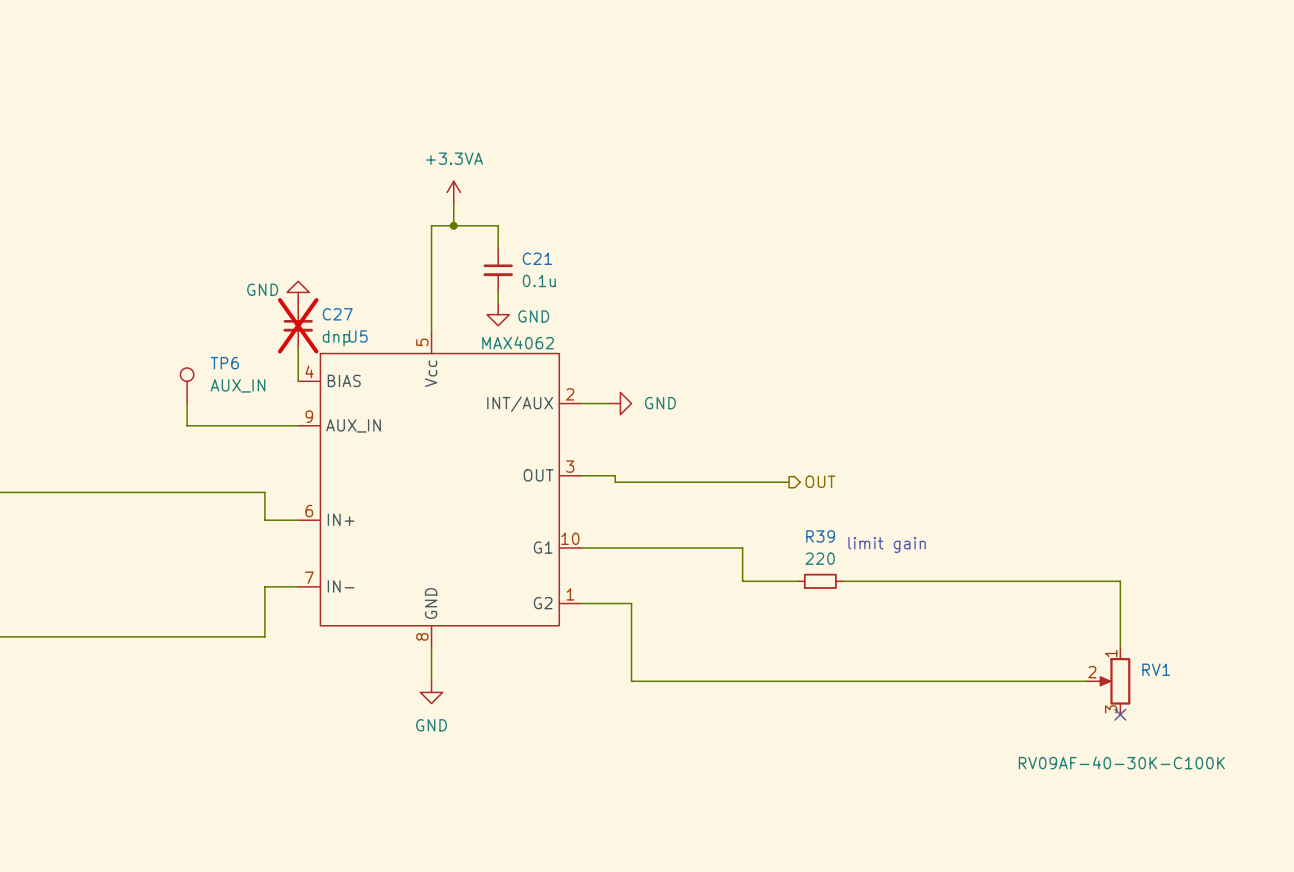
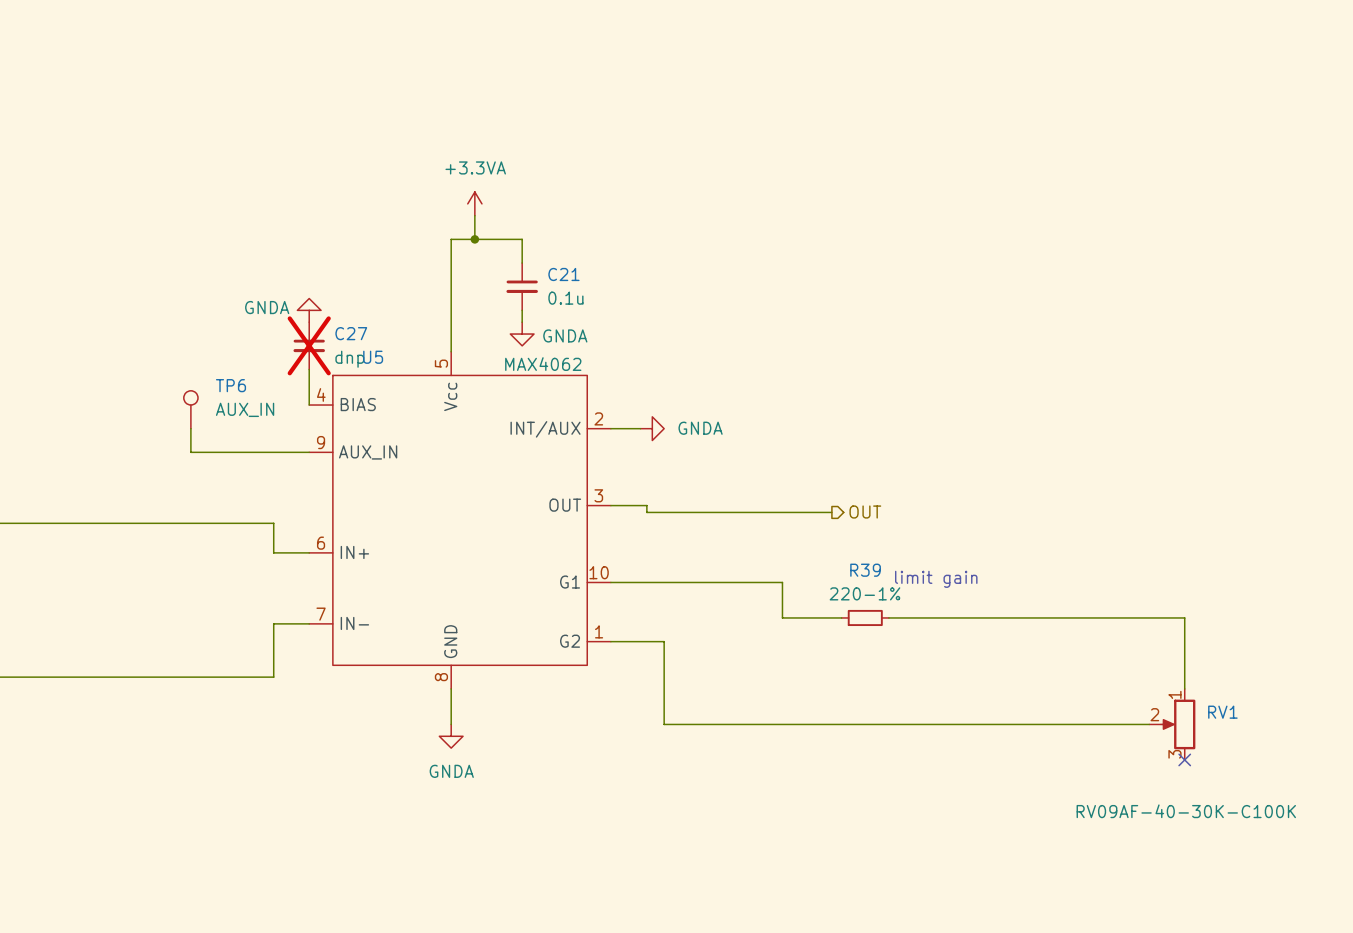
power symbol: GND (298, 292) -> GNDA (309, 310)
power symbol: GND (498, 314) -> GNDA (522, 334)
power symbol: GND (620, 403) -> GNDA (652, 428)
R39 value: 220 (820, 558) -> 220-1% (865, 593)
power symbol: GND (431, 692) -> GNDA (451, 736)

